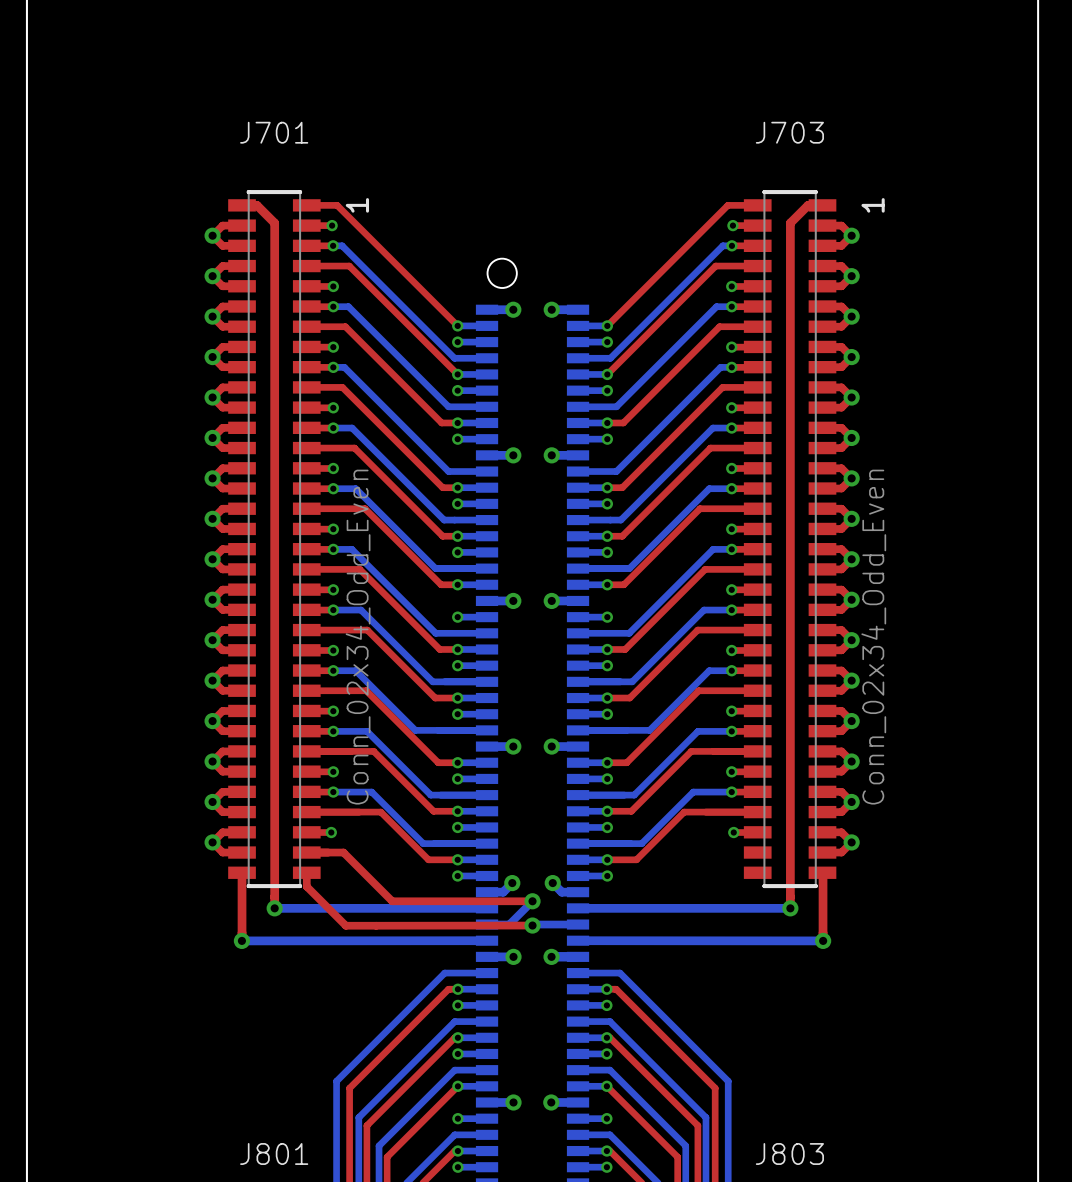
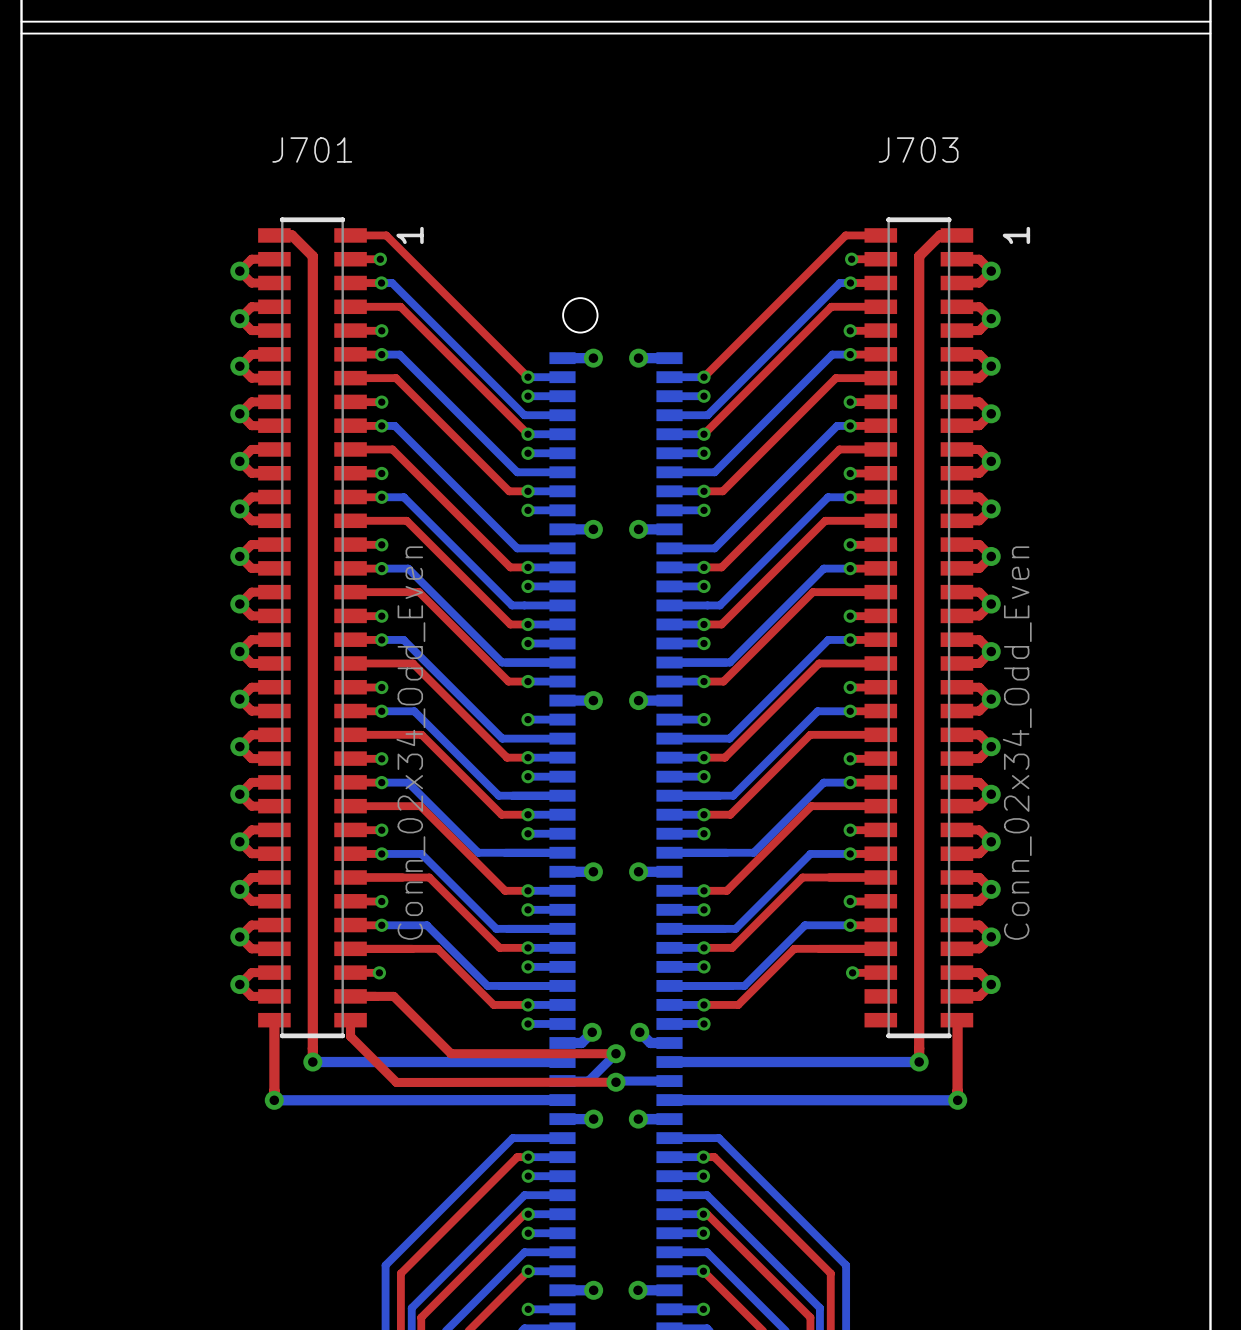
board edge: none -> (21, 21) (1210, 21)
board edge: none -> (21, 33) (1210, 33)

